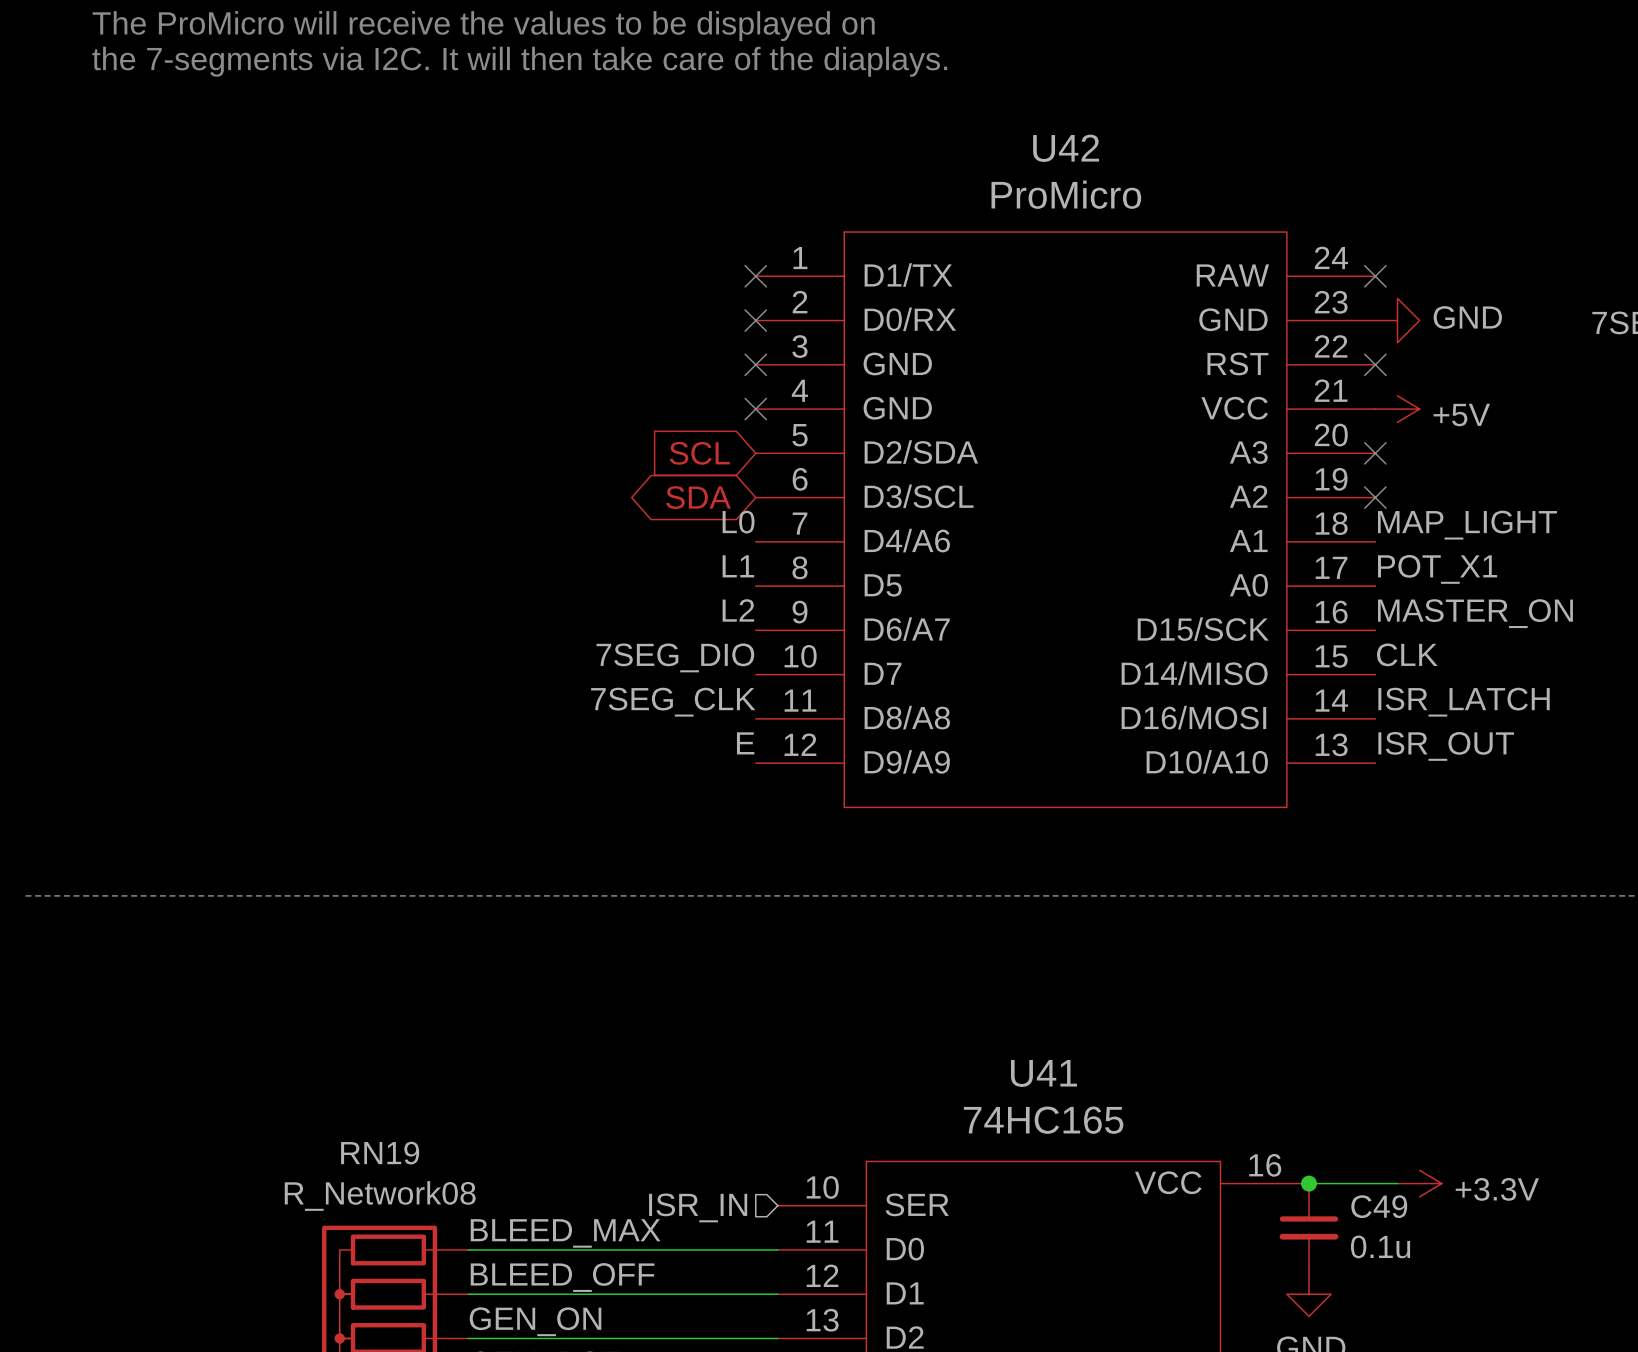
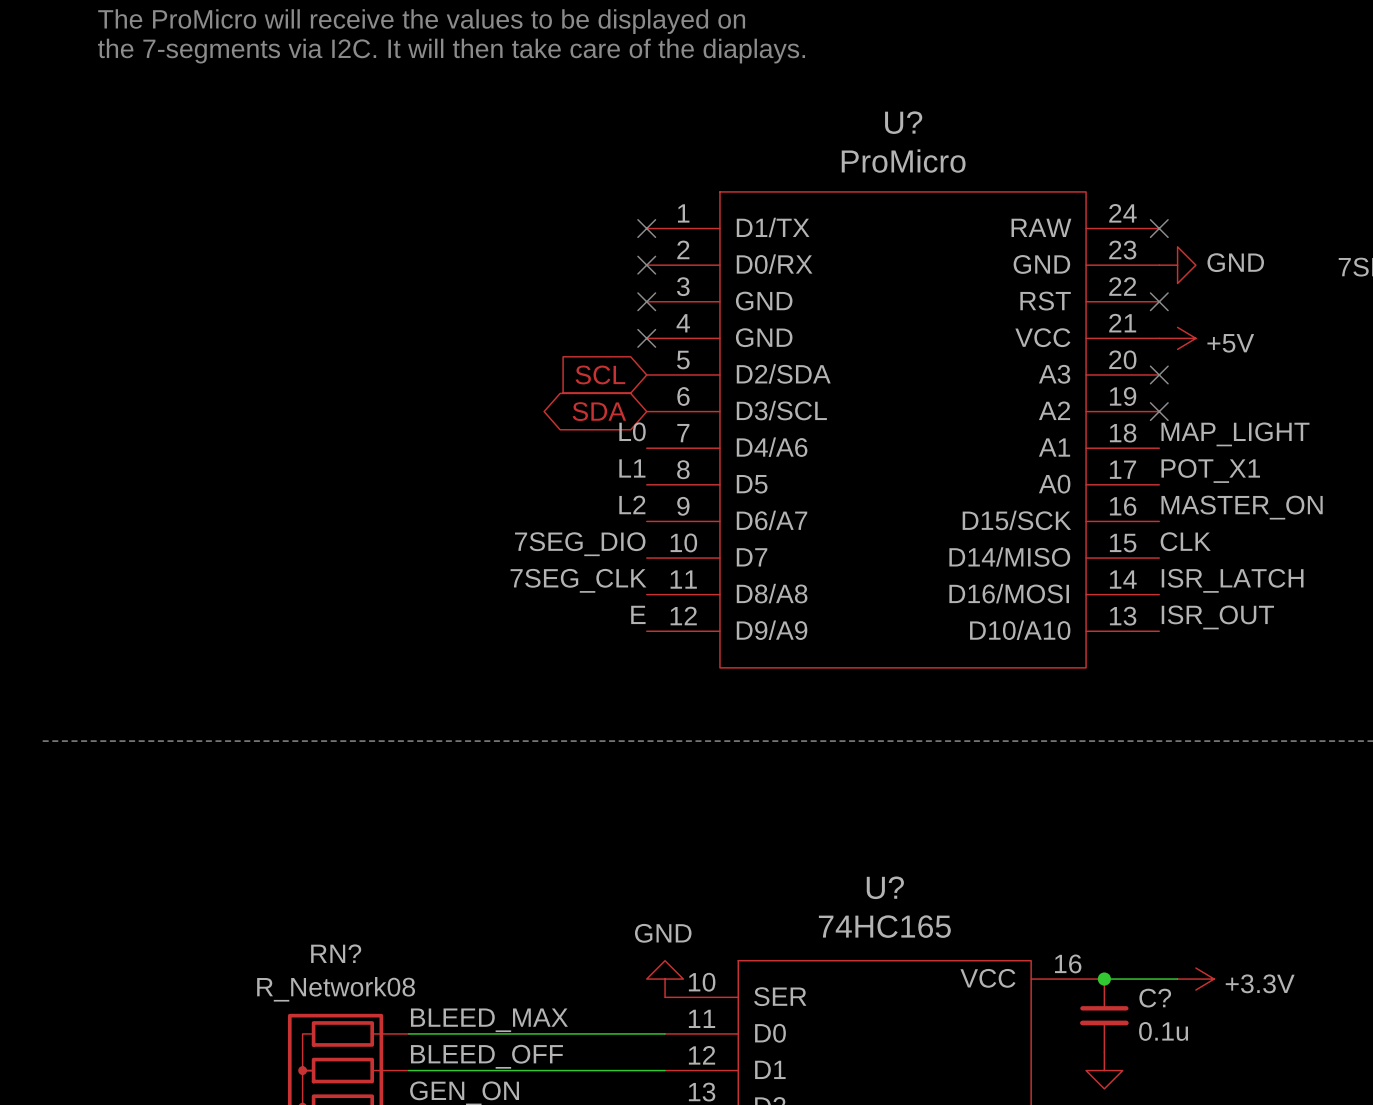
U42 name: U42 (1066, 148) -> U? (903, 122)
U41 name: U41 (1043, 1073) -> U? (885, 887)
RN19 name: RN19 (380, 1153) -> RN? (336, 953)
power symbol: none -> GND (665, 979)
C49 name: C49 (1379, 1206) -> C? (1155, 998)
hierarchical label: ISR_IN (698, 1207) -> none

